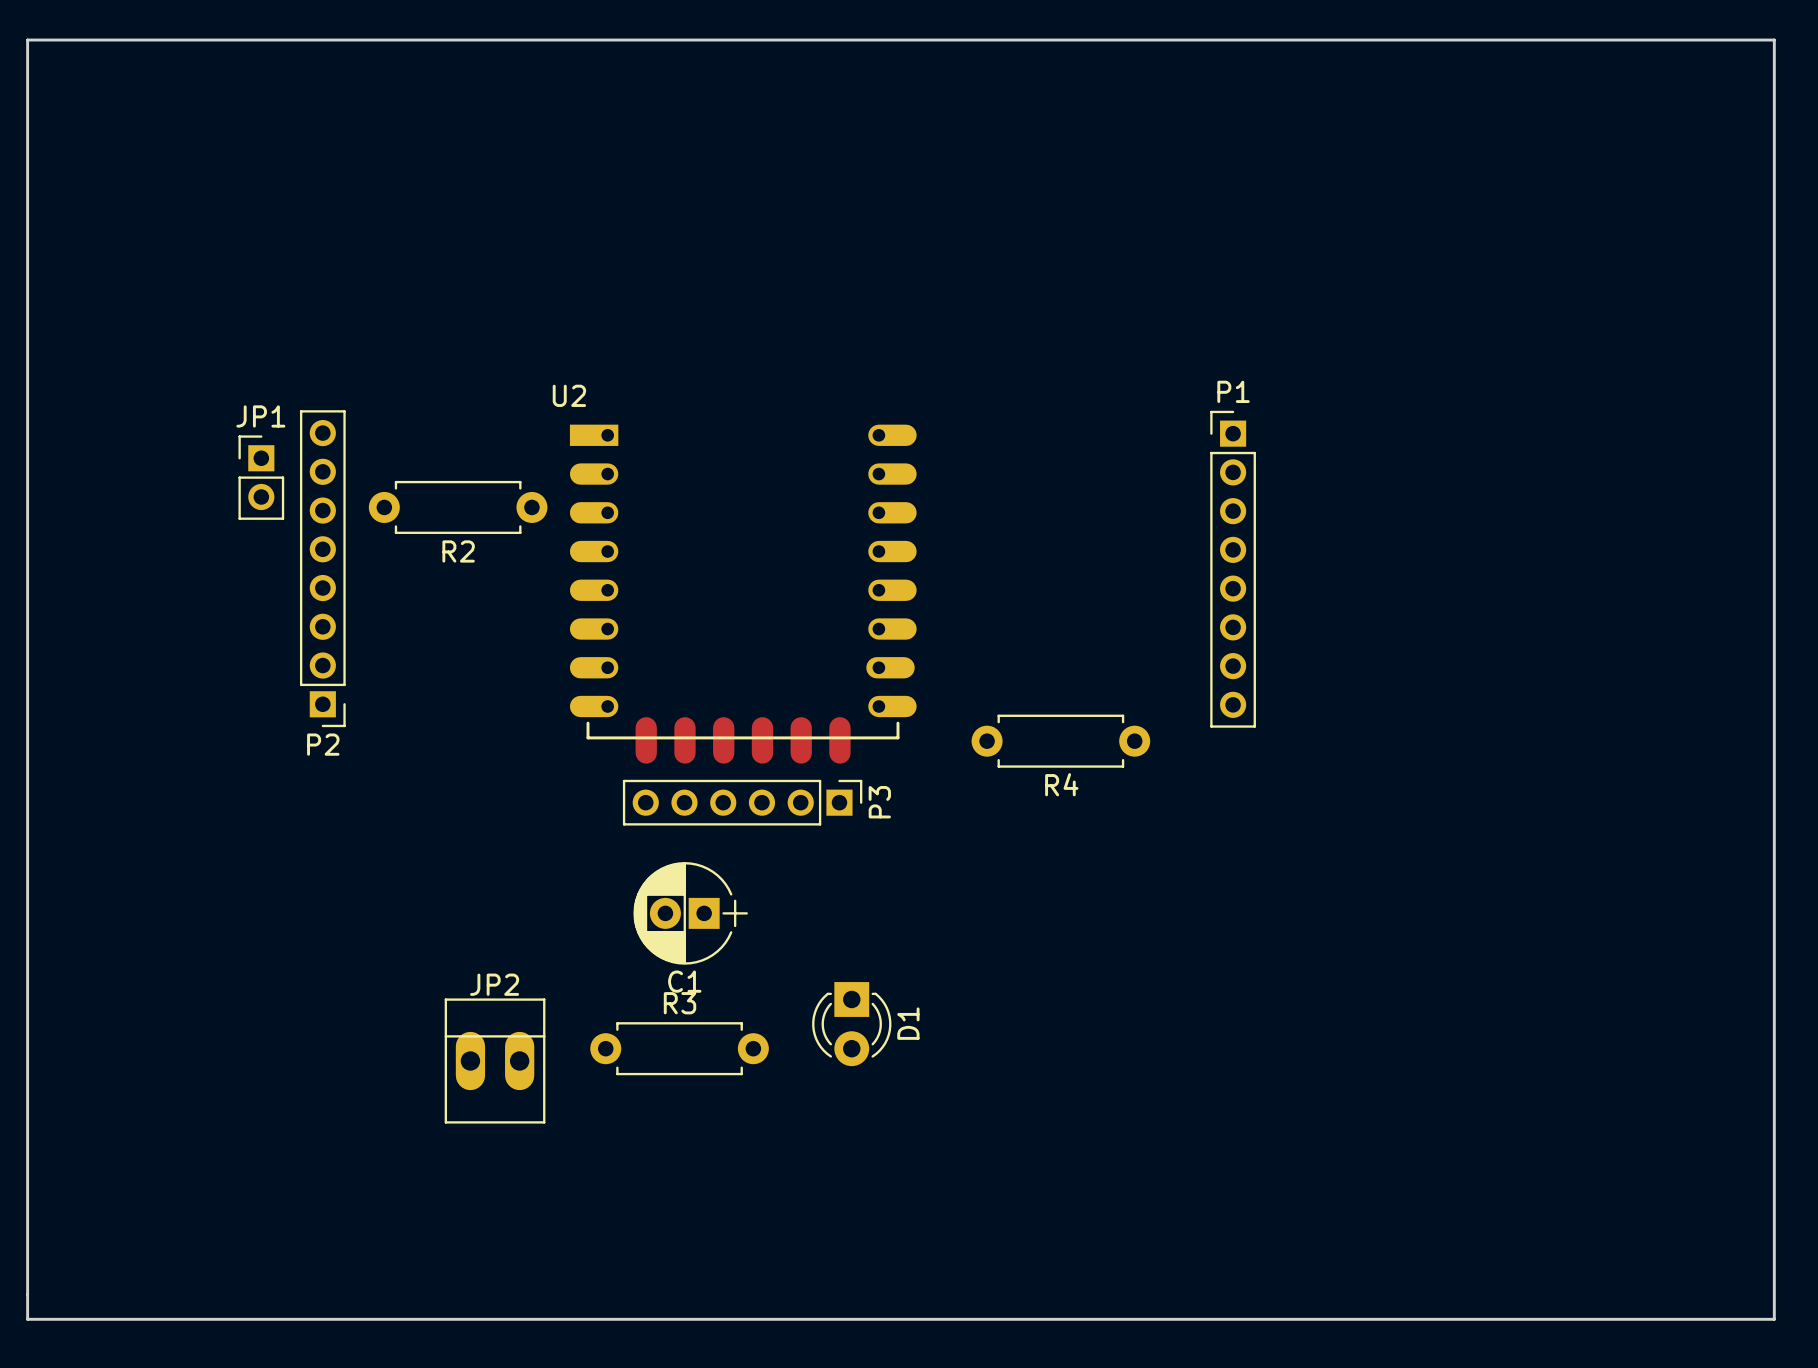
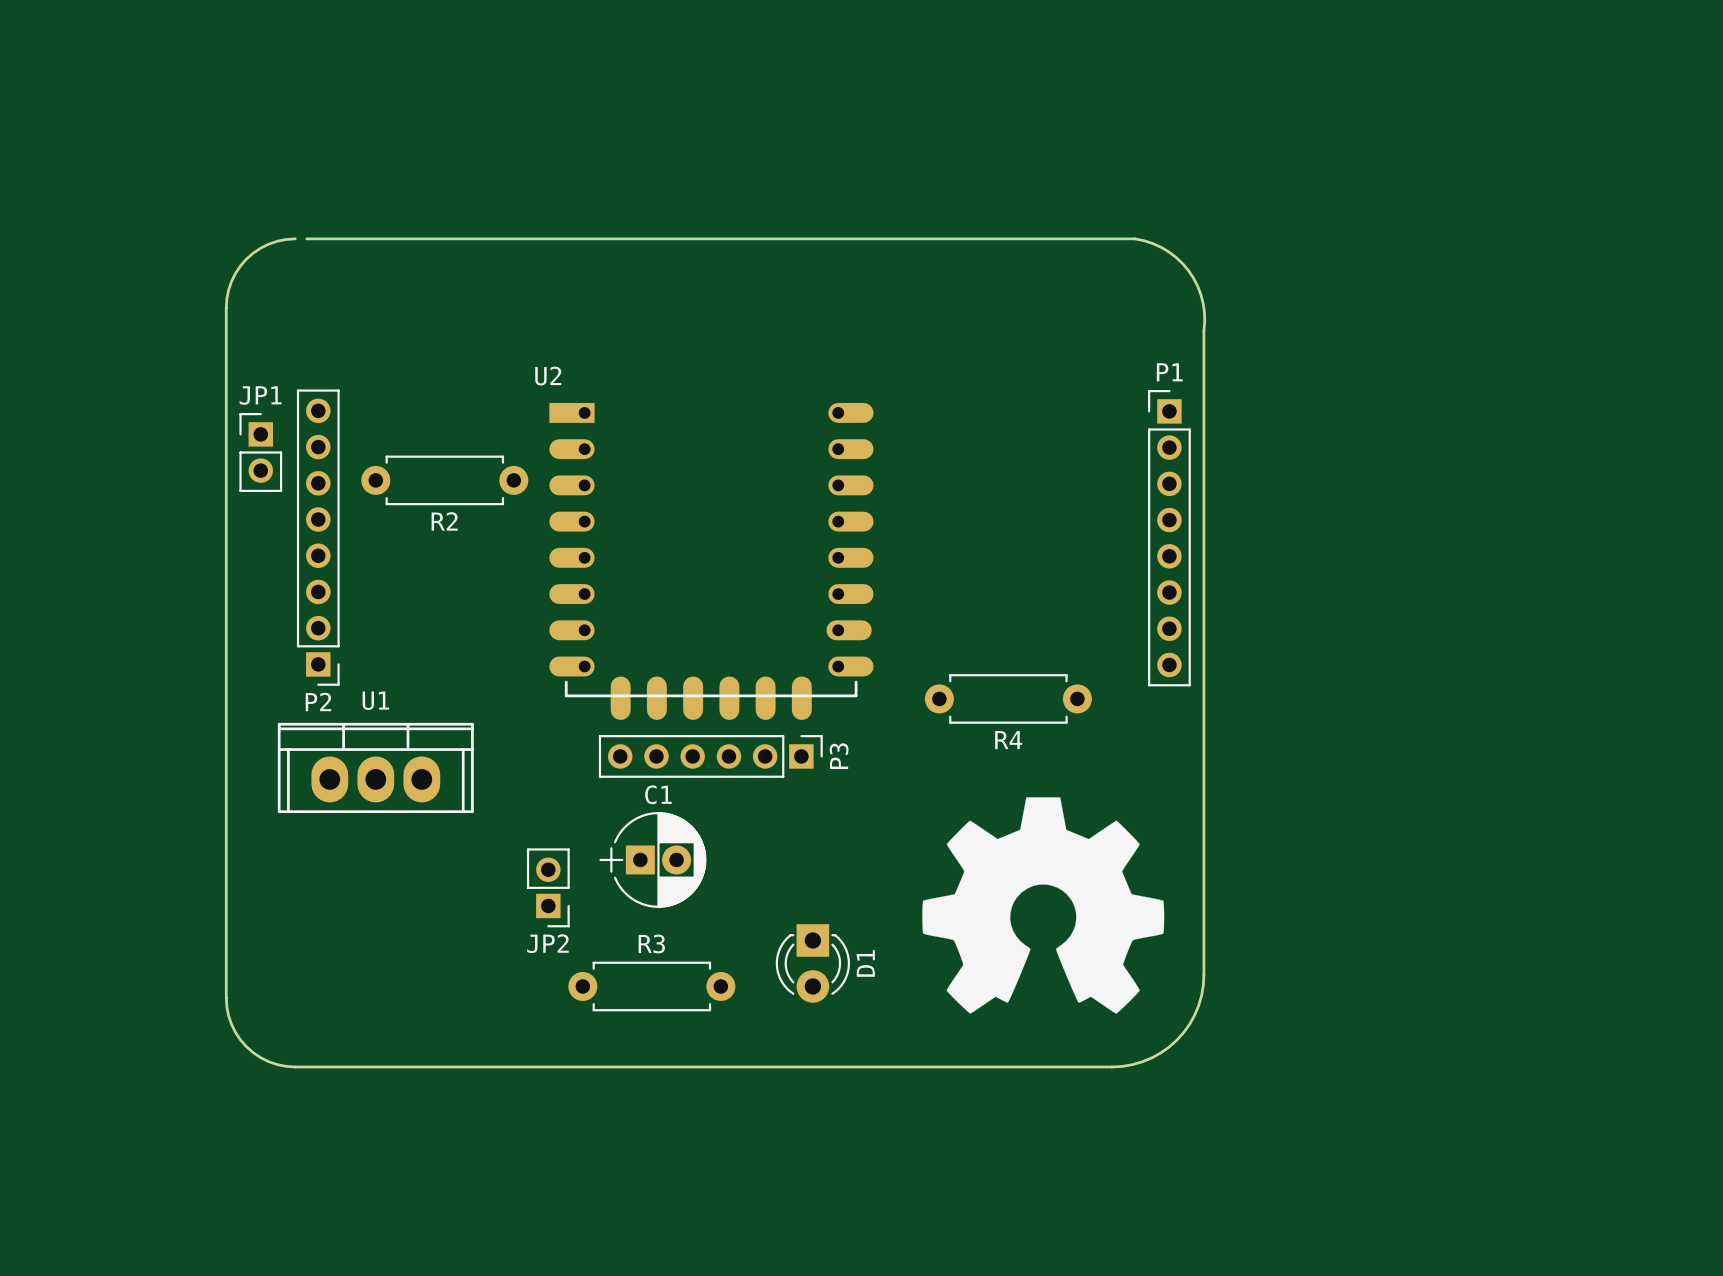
board edge: (27, 40) (27, 1319) (1774, 1319) (1774, 40) (27, 40) -> none
board edge: none -> (295, 238) (268, 244) (246, 259) (231, 281) (226, 307) (226, 997) (231, 1024) (246, 1046) (268, 1061) (295, 1066) (1111, 1066)
board edge: none -> (306, 238) (1134, 238) (1152, 243) (1168, 251) (1188, 270) (1200, 294) (1204, 312) (1203, 330)
board edge: none -> (1203, 330) (1203, 985) (1194, 1014) (1176, 1040) (1151, 1057) (1132, 1064) (1111, 1066)
U1: none -> (375, 767)
drawing: none -> [922, 797, 1165, 1014]
C1 rotation: 0° (690, 913) -> 180° (652, 859)
JP2 name position: JP2 (494, 984) -> JP2 (547, 943)
JP2 footprint: [444, 998, 546, 1124] -> [526, 848, 570, 928]

